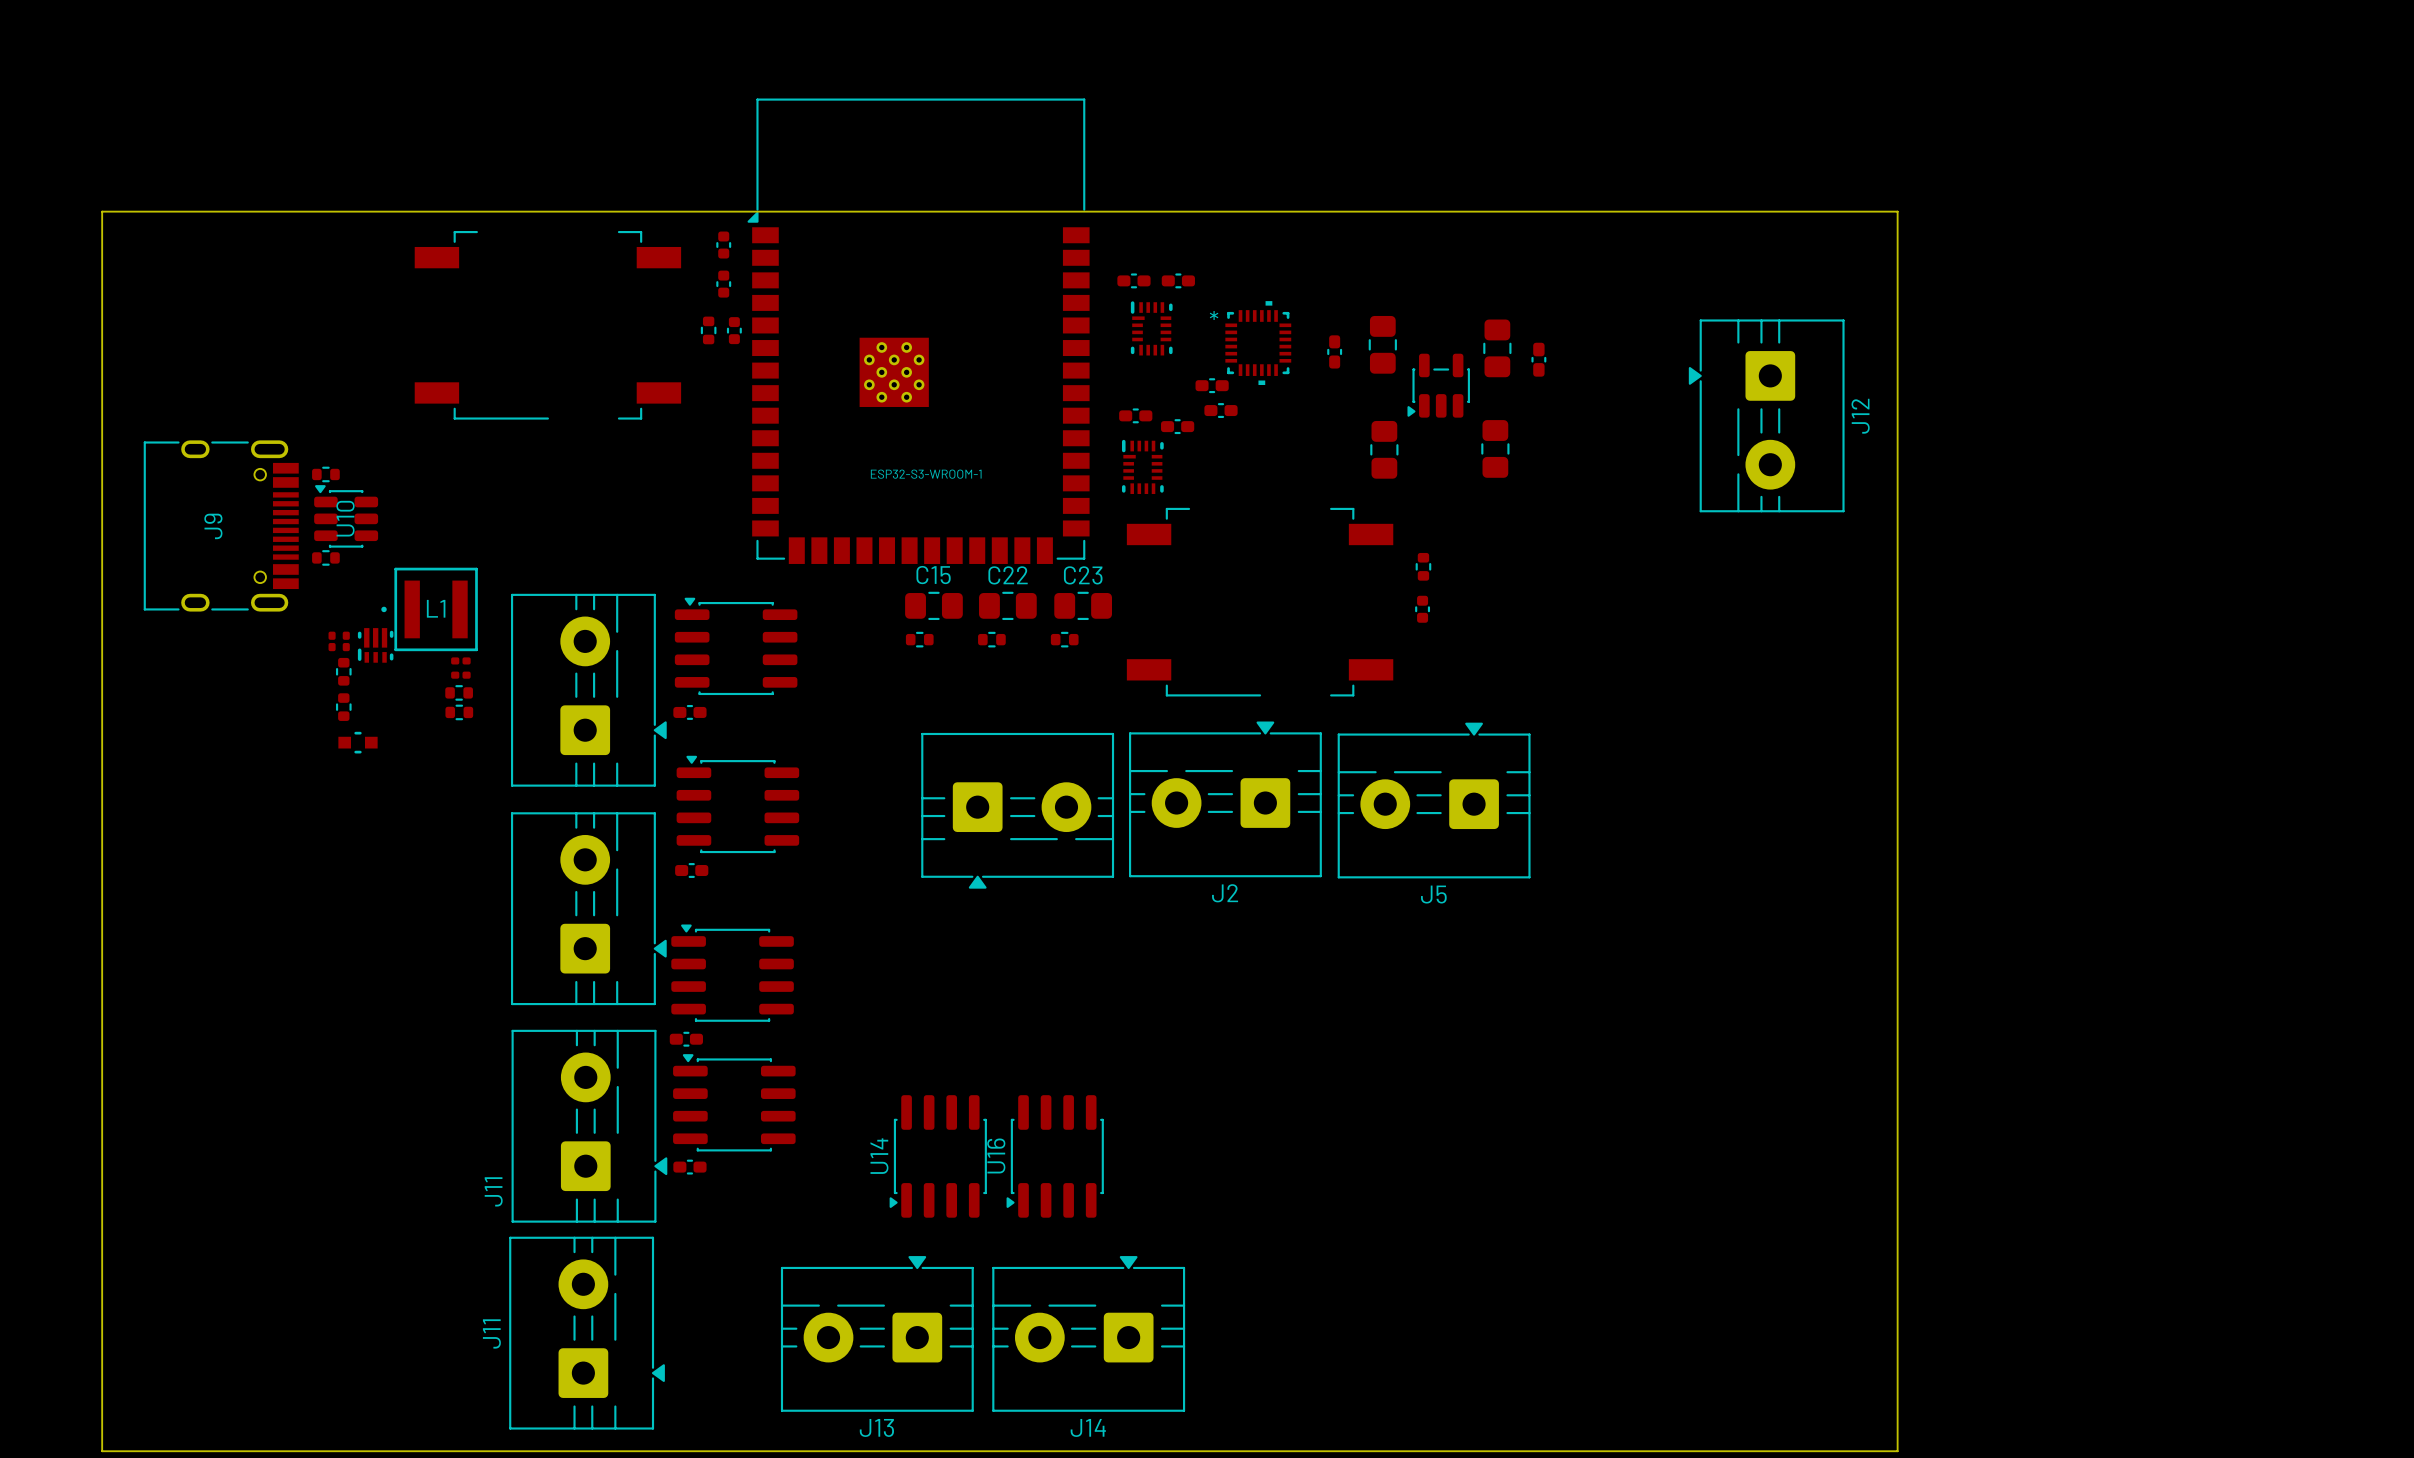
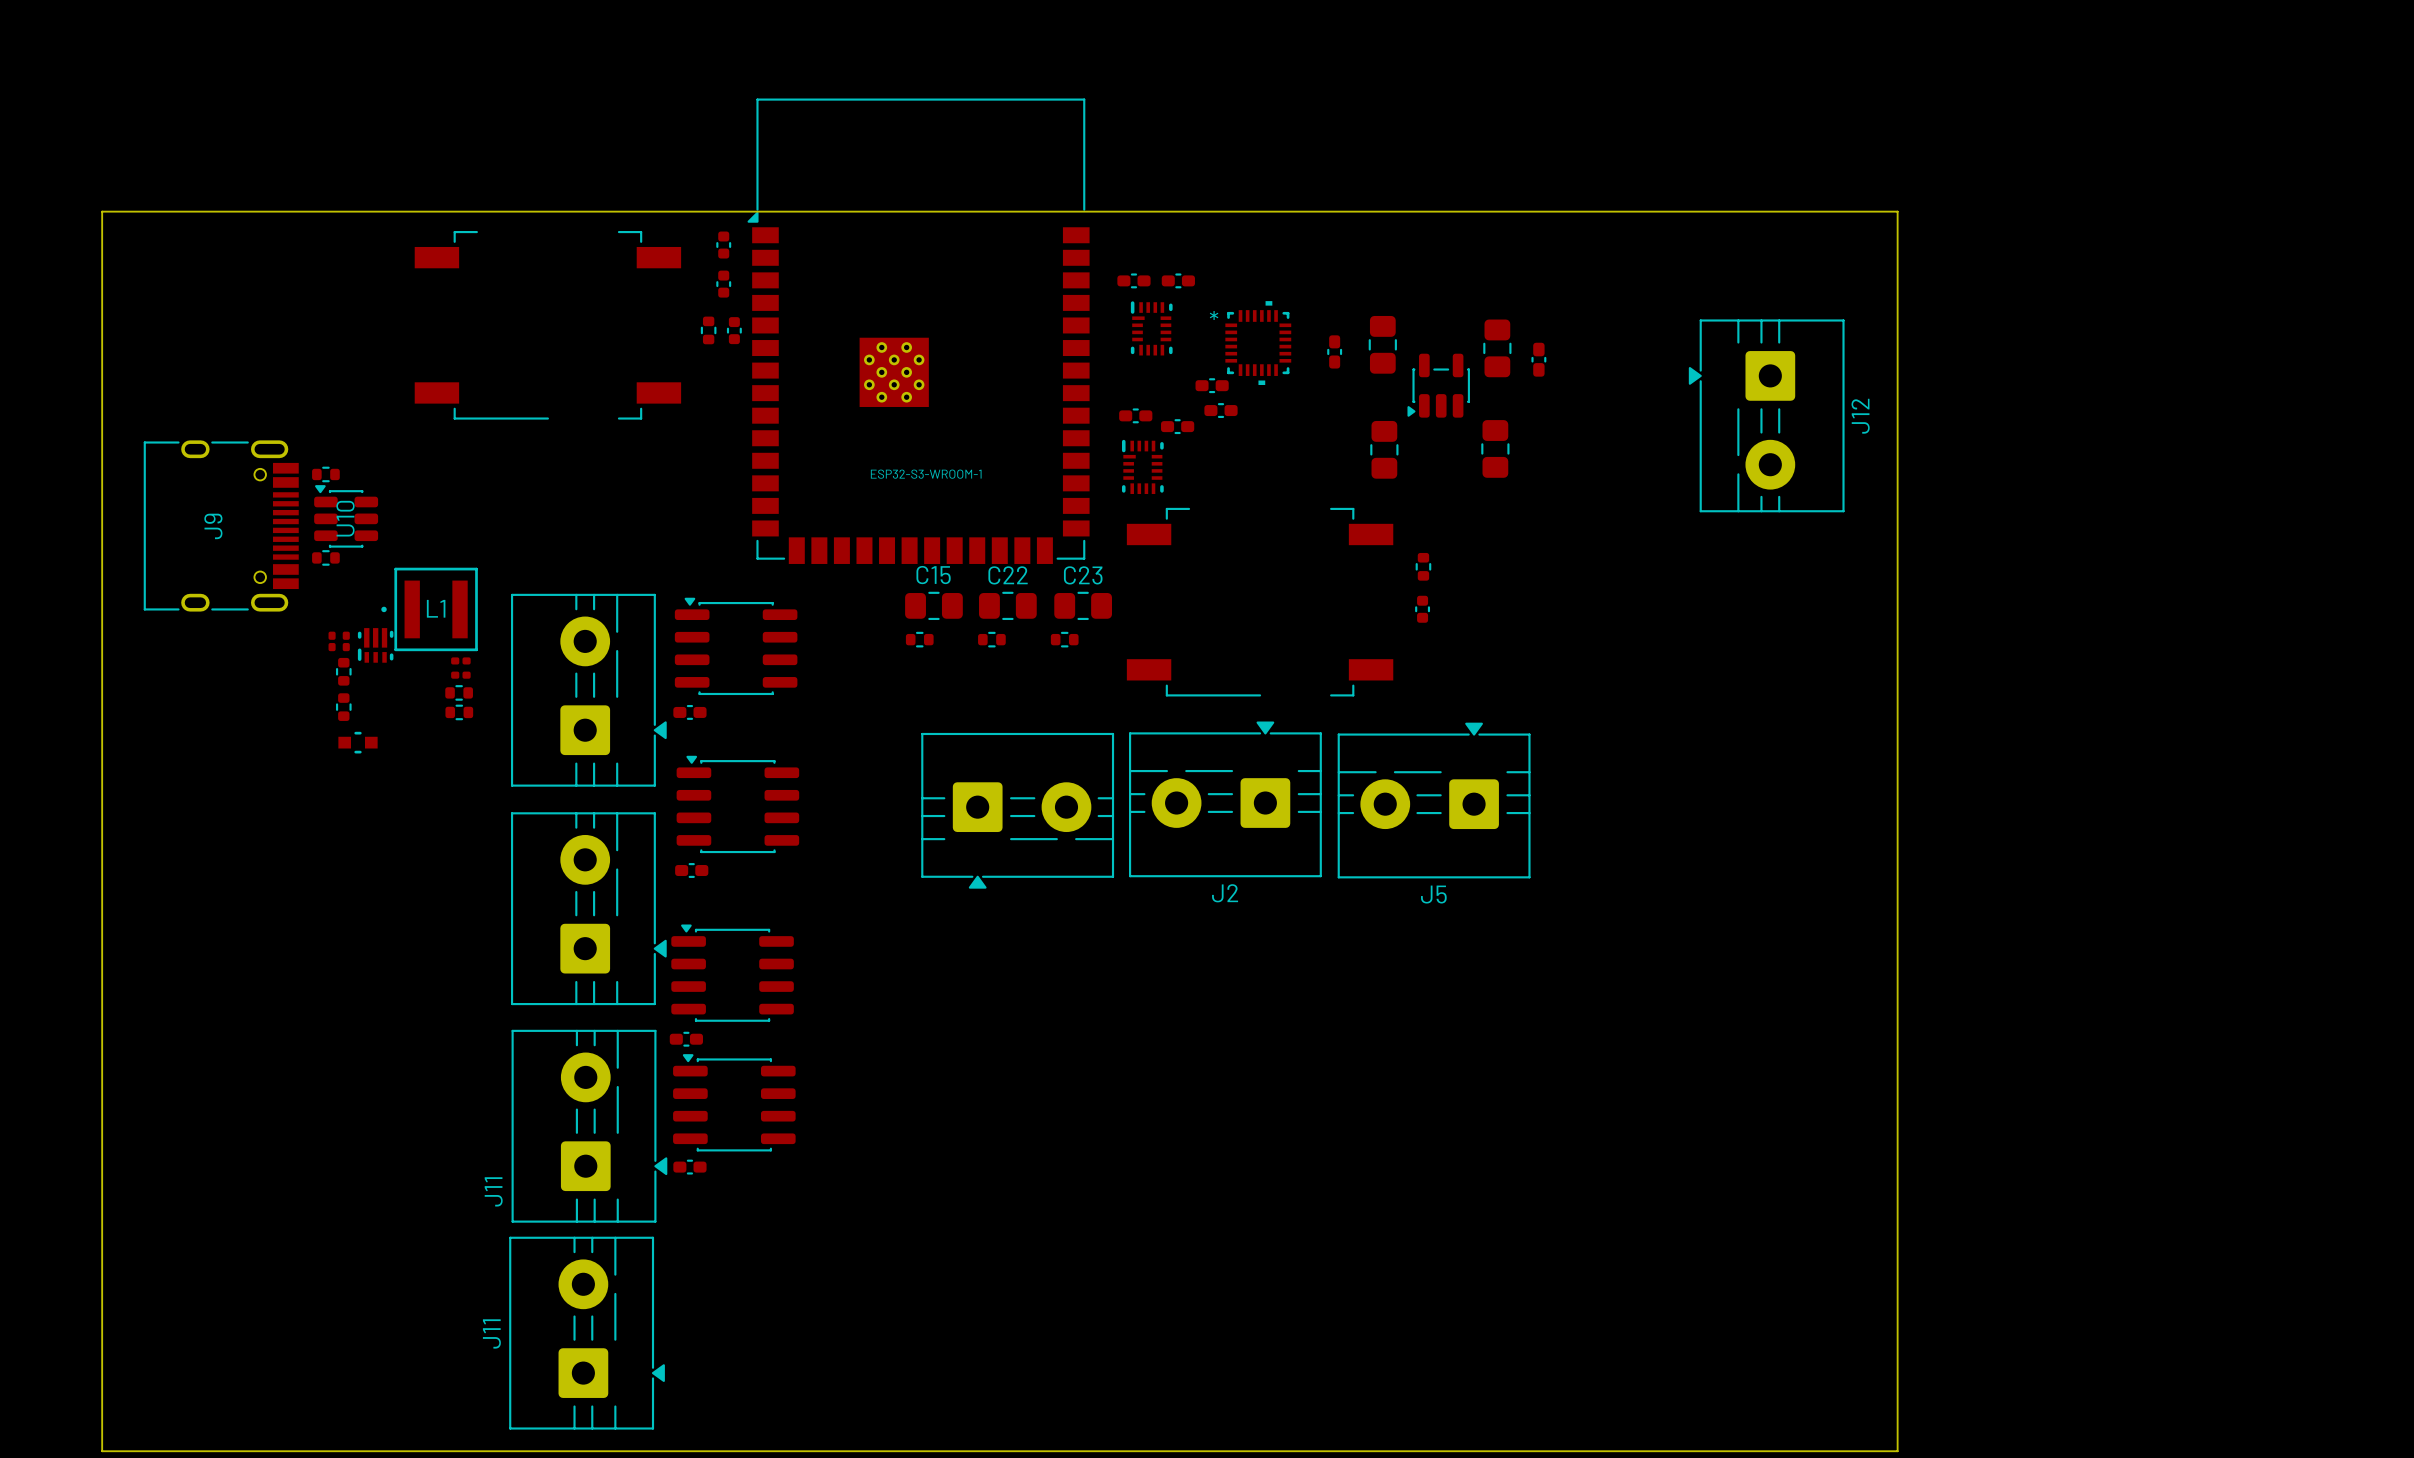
U14: (938, 1156) -> none
U16: (1055, 1156) -> none
J13: (877, 1333) -> none
J14: (1088, 1333) -> none

